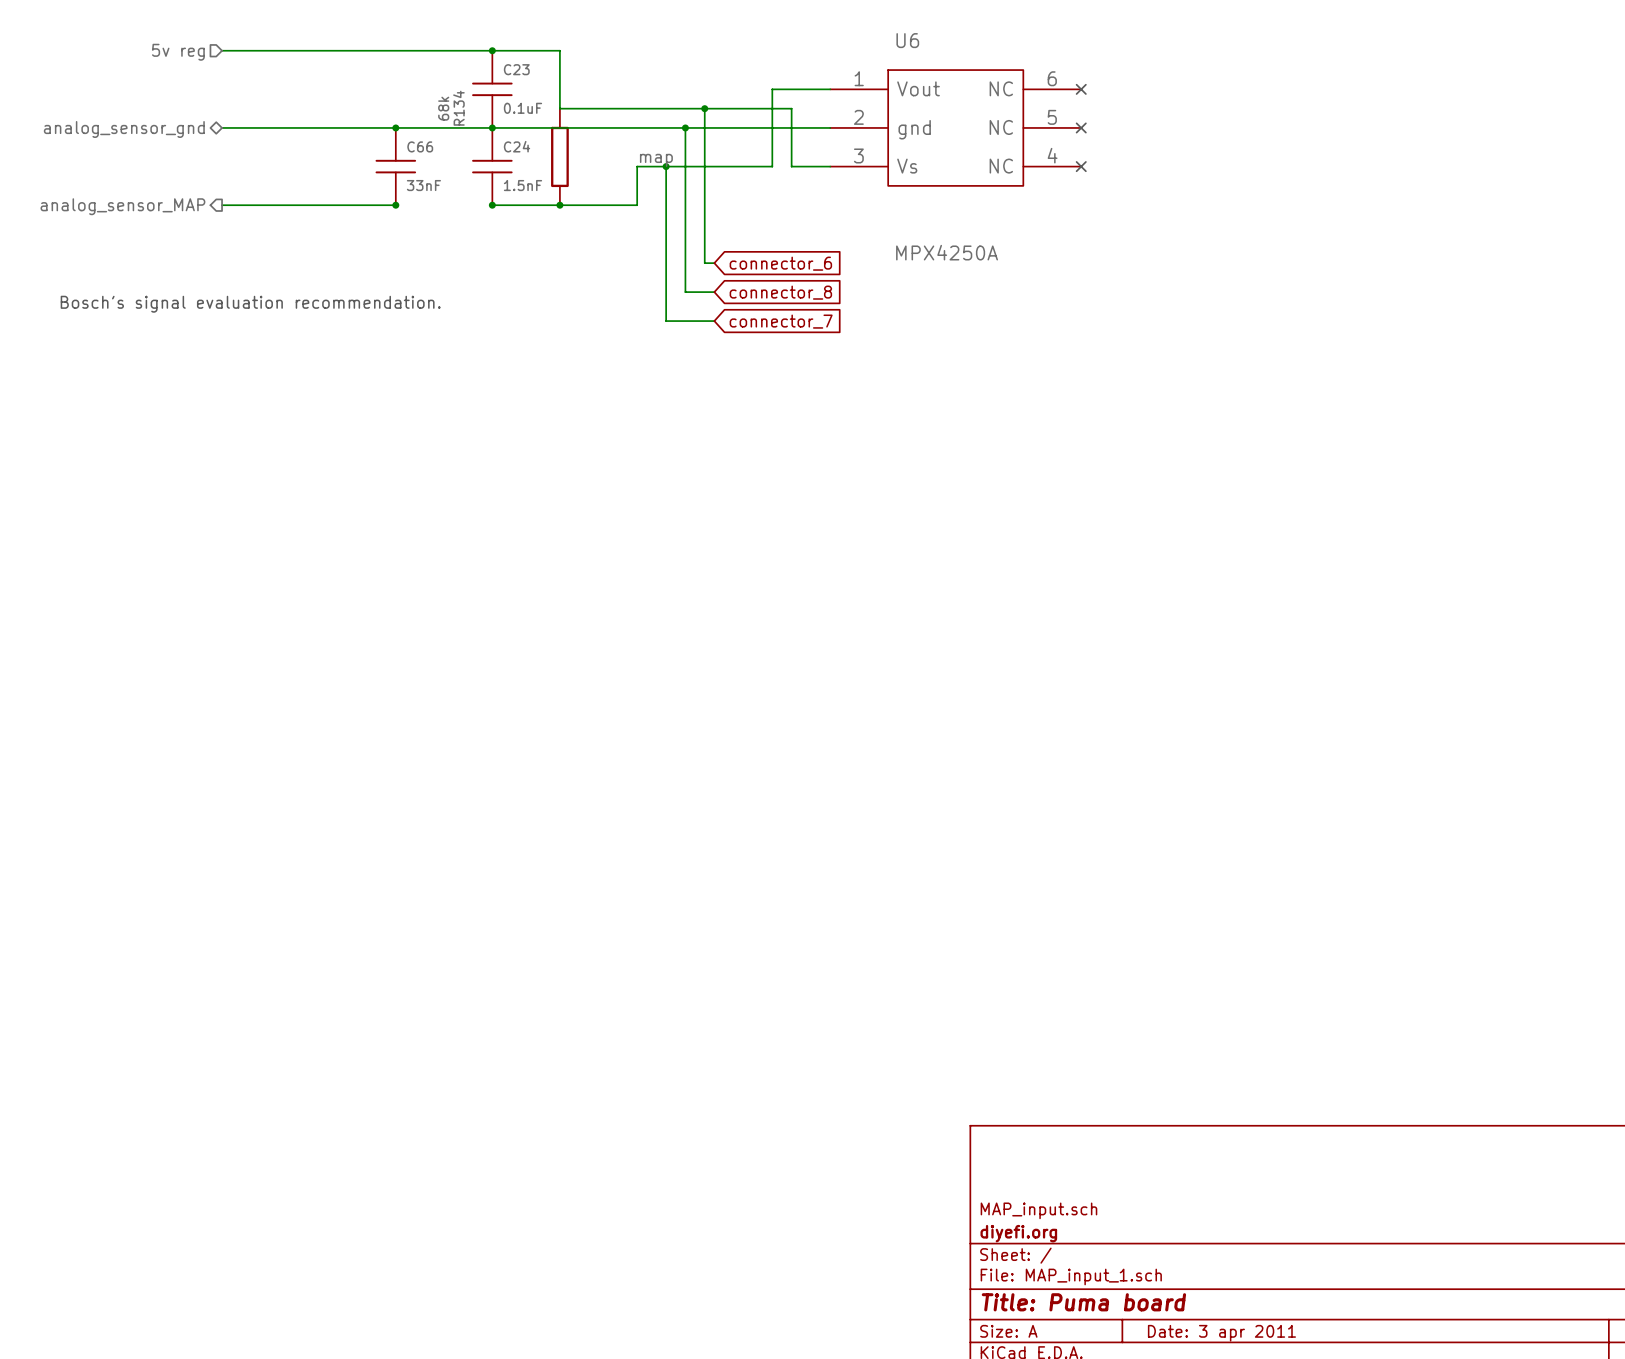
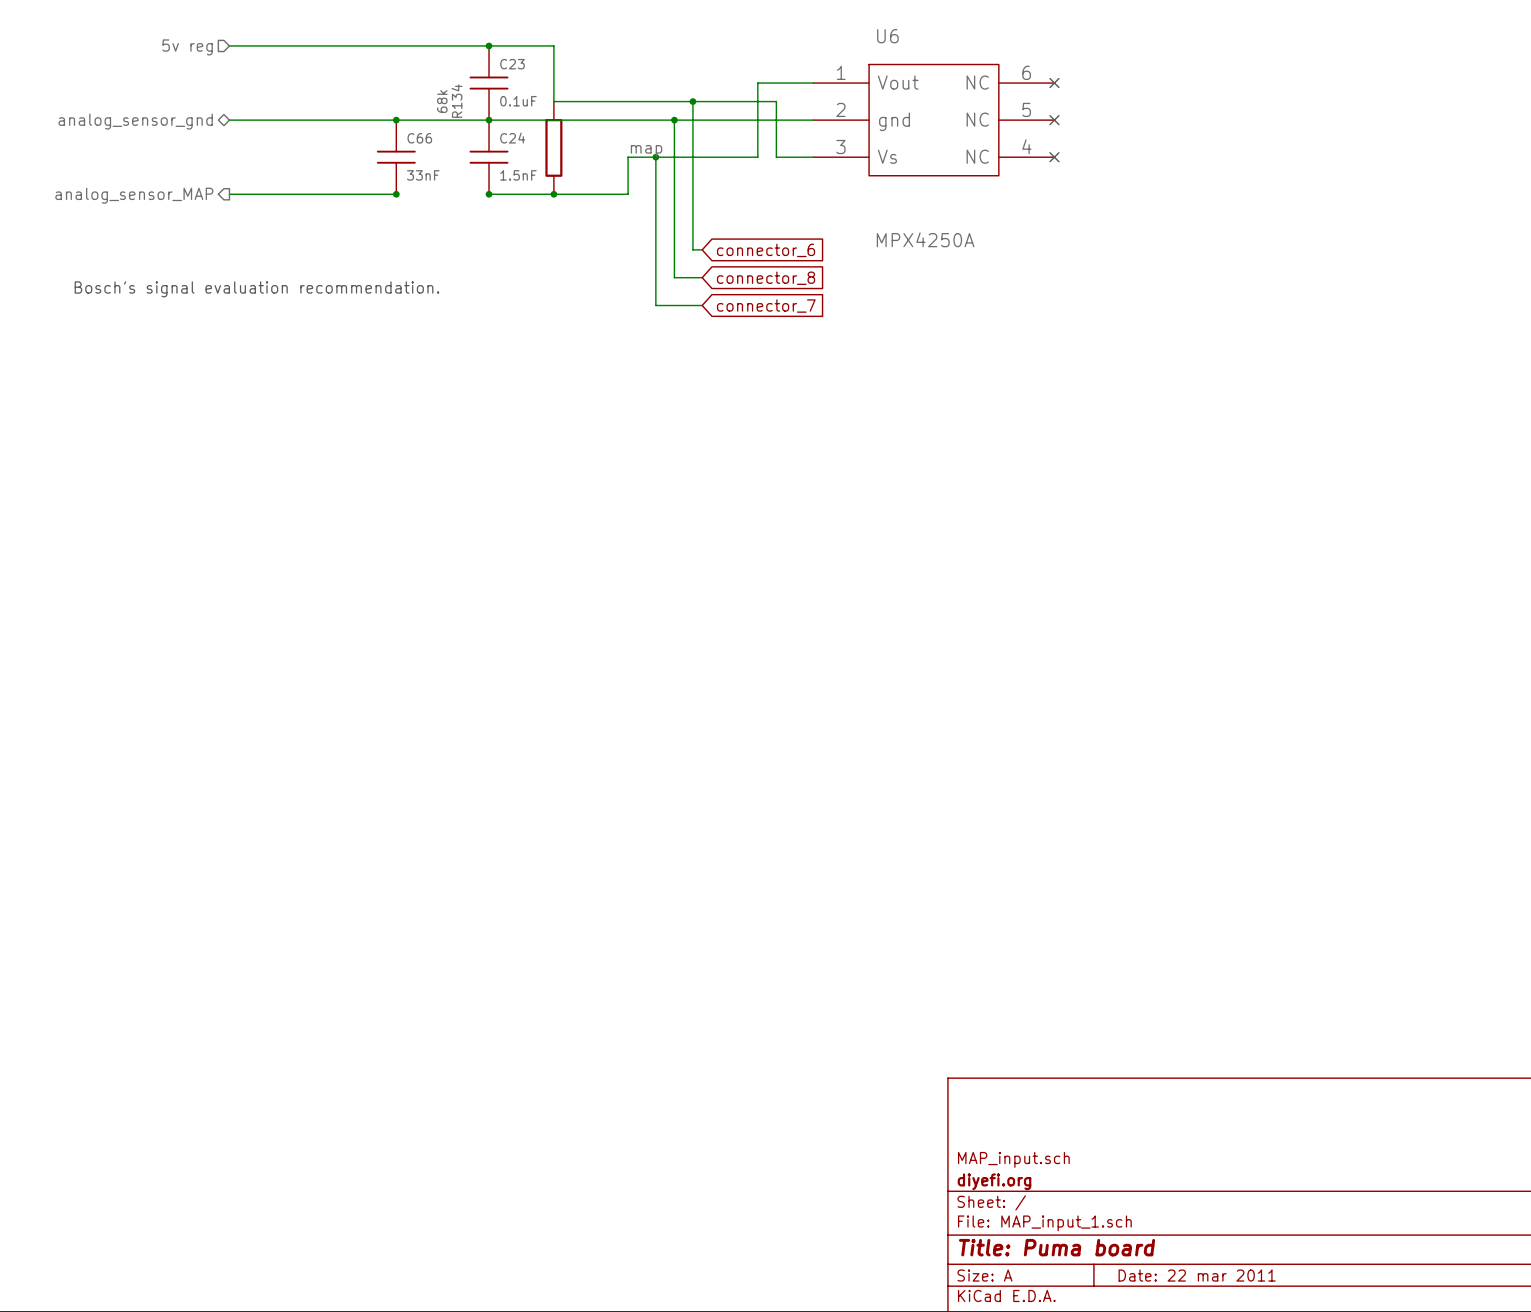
title block: Date: 3 apr 2011 (1221, 1333) -> Date: 22 mar 2011 (1197, 1275)

